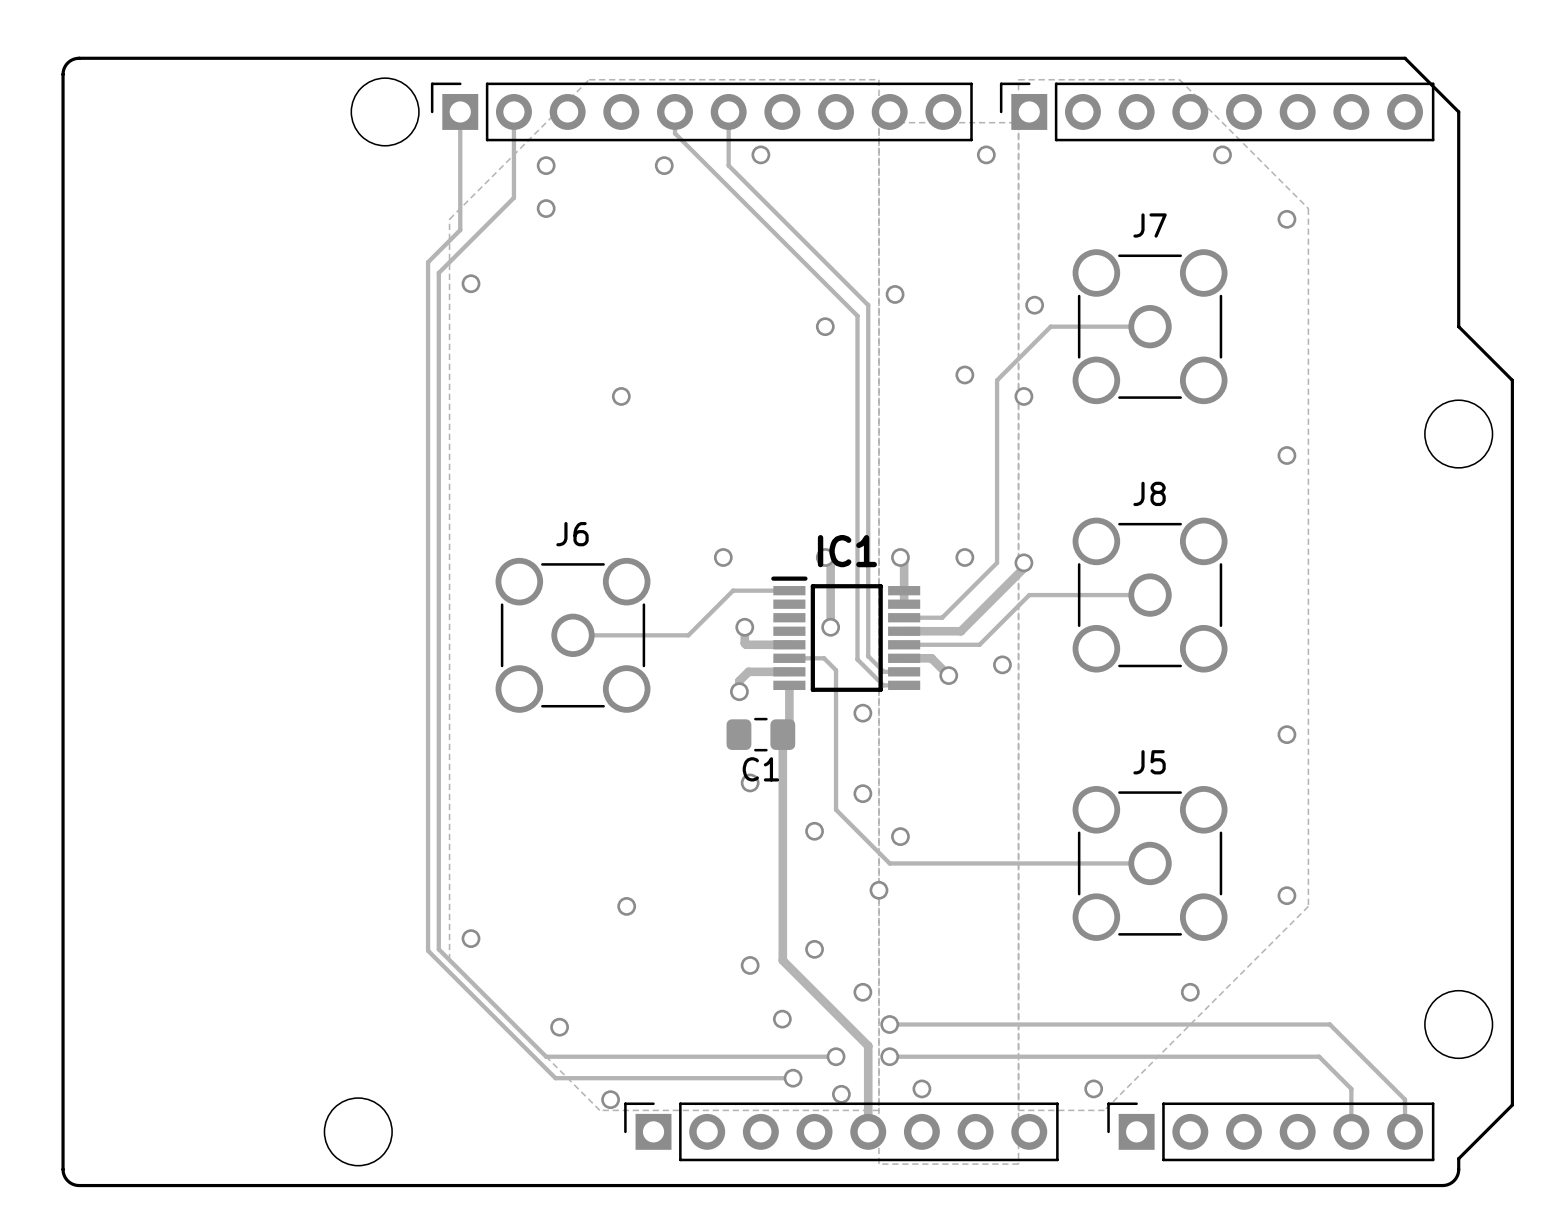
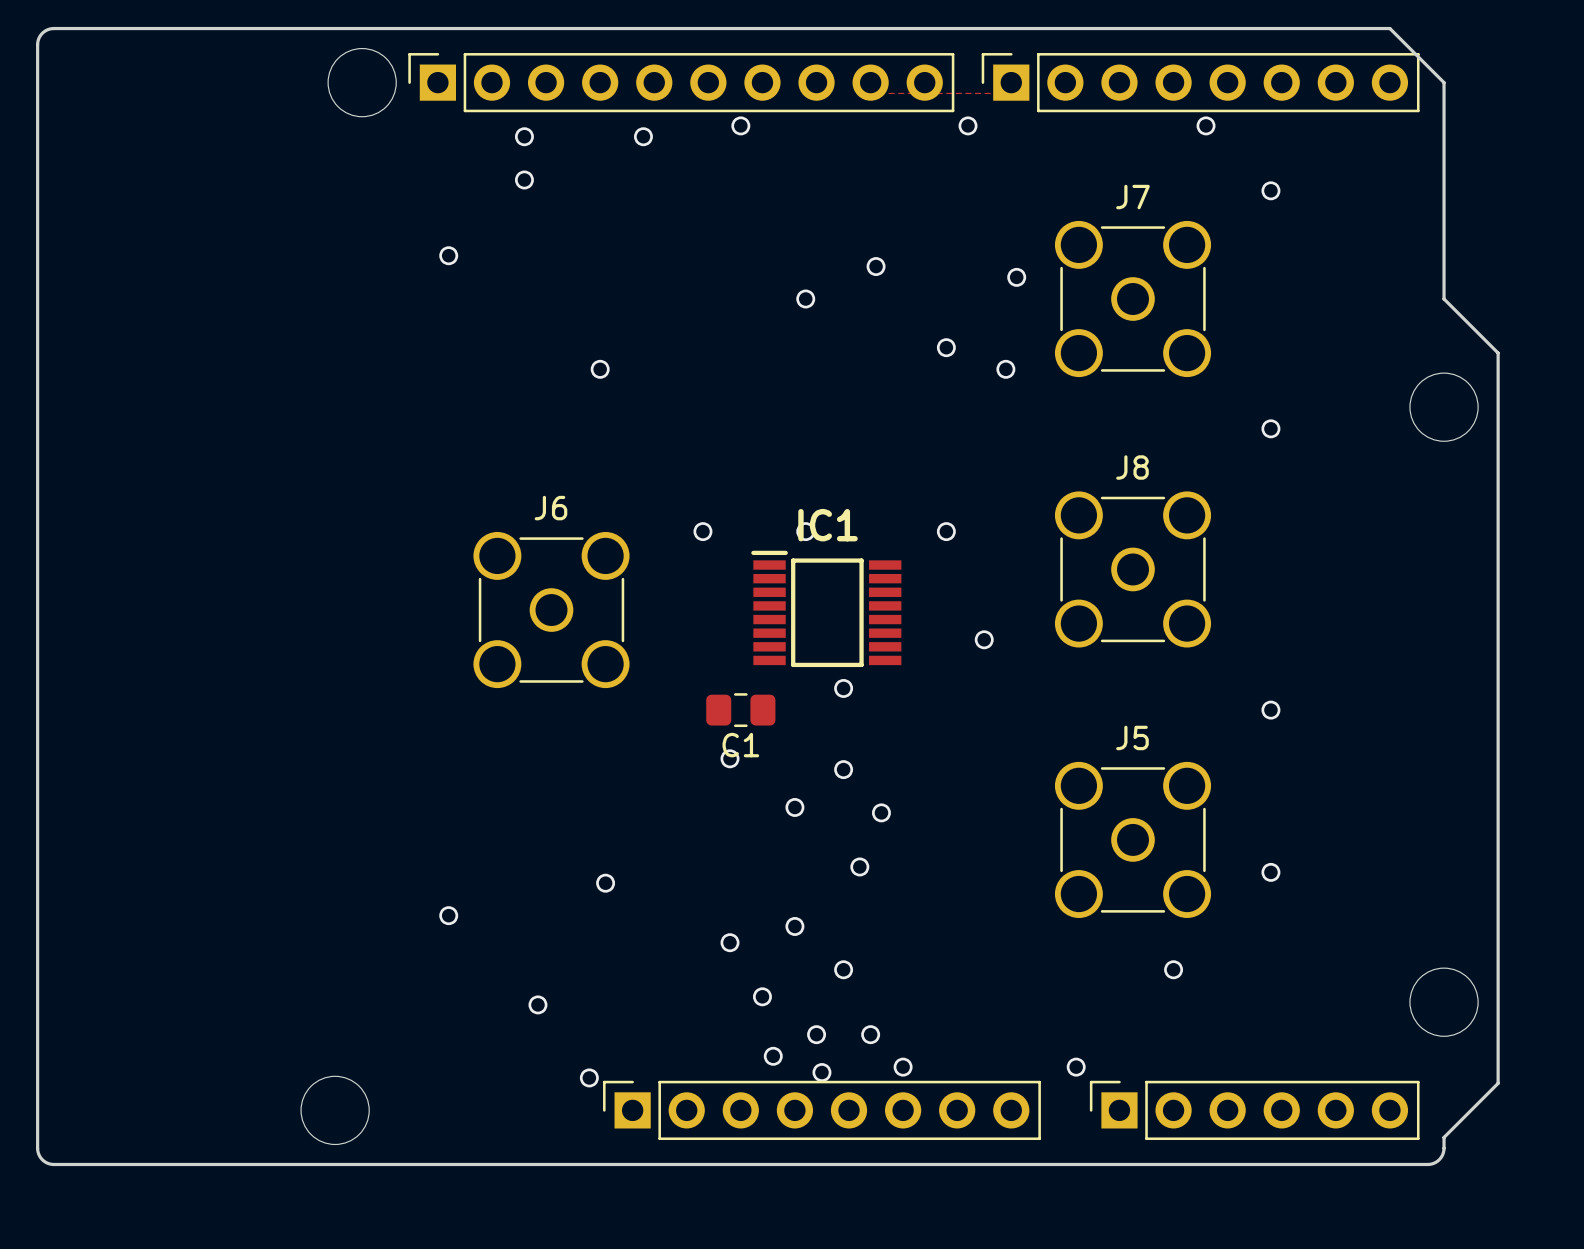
track: (460, 111) (460, 230) (428, 262) (428, 950) (555, 1078) (793, 1078) -> none
track: (513, 111) (513, 197) (438, 272) (438, 949) (546, 1056) (836, 1056) -> none
track: (674, 111) (674, 133) (857, 315) (857, 659) (883, 685) (904, 685) -> none
track: (728, 111) (728, 165) (868, 305) (868, 656) (883, 671) (904, 671) -> none
track: (1150, 326) (1050, 326) (997, 380) (997, 562) (942, 617) (904, 617) -> none
track: (825, 557) (830, 562) (830, 627) -> none
track: (900, 557) (904, 561) (904, 604) -> none
via: (900, 557) -> none
track: (1023, 562) (1023, 568) (960, 631) (904, 631) -> none
via: (1023, 562) -> none
track: (789, 590) (733, 590) (688, 635) (573, 635) -> none
track: (1150, 595) (1029, 595) (979, 644) (904, 644) -> none
track: (744, 627) (746, 644) (789, 644) -> none
via: (744, 627) -> none
via: (830, 627) -> none
track: (789, 658) (824, 658) (836, 670) (836, 809) (889, 863) (1150, 863) -> none
track: (904, 658) (931, 658) (948, 675) -> none
track: (789, 671) (748, 671) (739, 680) (739, 691) -> none
via: (948, 675) -> none
track: (789, 685) (789, 728) (782, 734) (782, 960) (868, 1045) (868, 1131) -> none
via: (739, 691) -> none
track: (889, 1024) (1329, 1024) (1405, 1099) (1405, 1131) -> none
via: (889, 1024) -> none
track: (889, 1056) (1319, 1056) (1351, 1088) (1351, 1131) -> none
zone outline: (878, 1110) (599, 1110) (449, 960) (449, 219) (589, 79) (878, 79) (878, 1164) (1018, 1164) (1018, 79) (1179, 79) (1308, 208) (1308, 906) (1104, 1110) (1018, 1110) -> none

